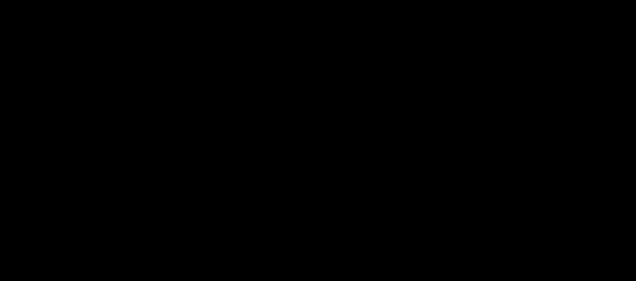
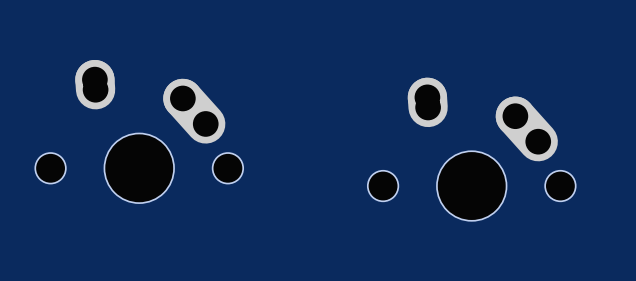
part: none -> (139, 131)
part: none -> (471, 149)

